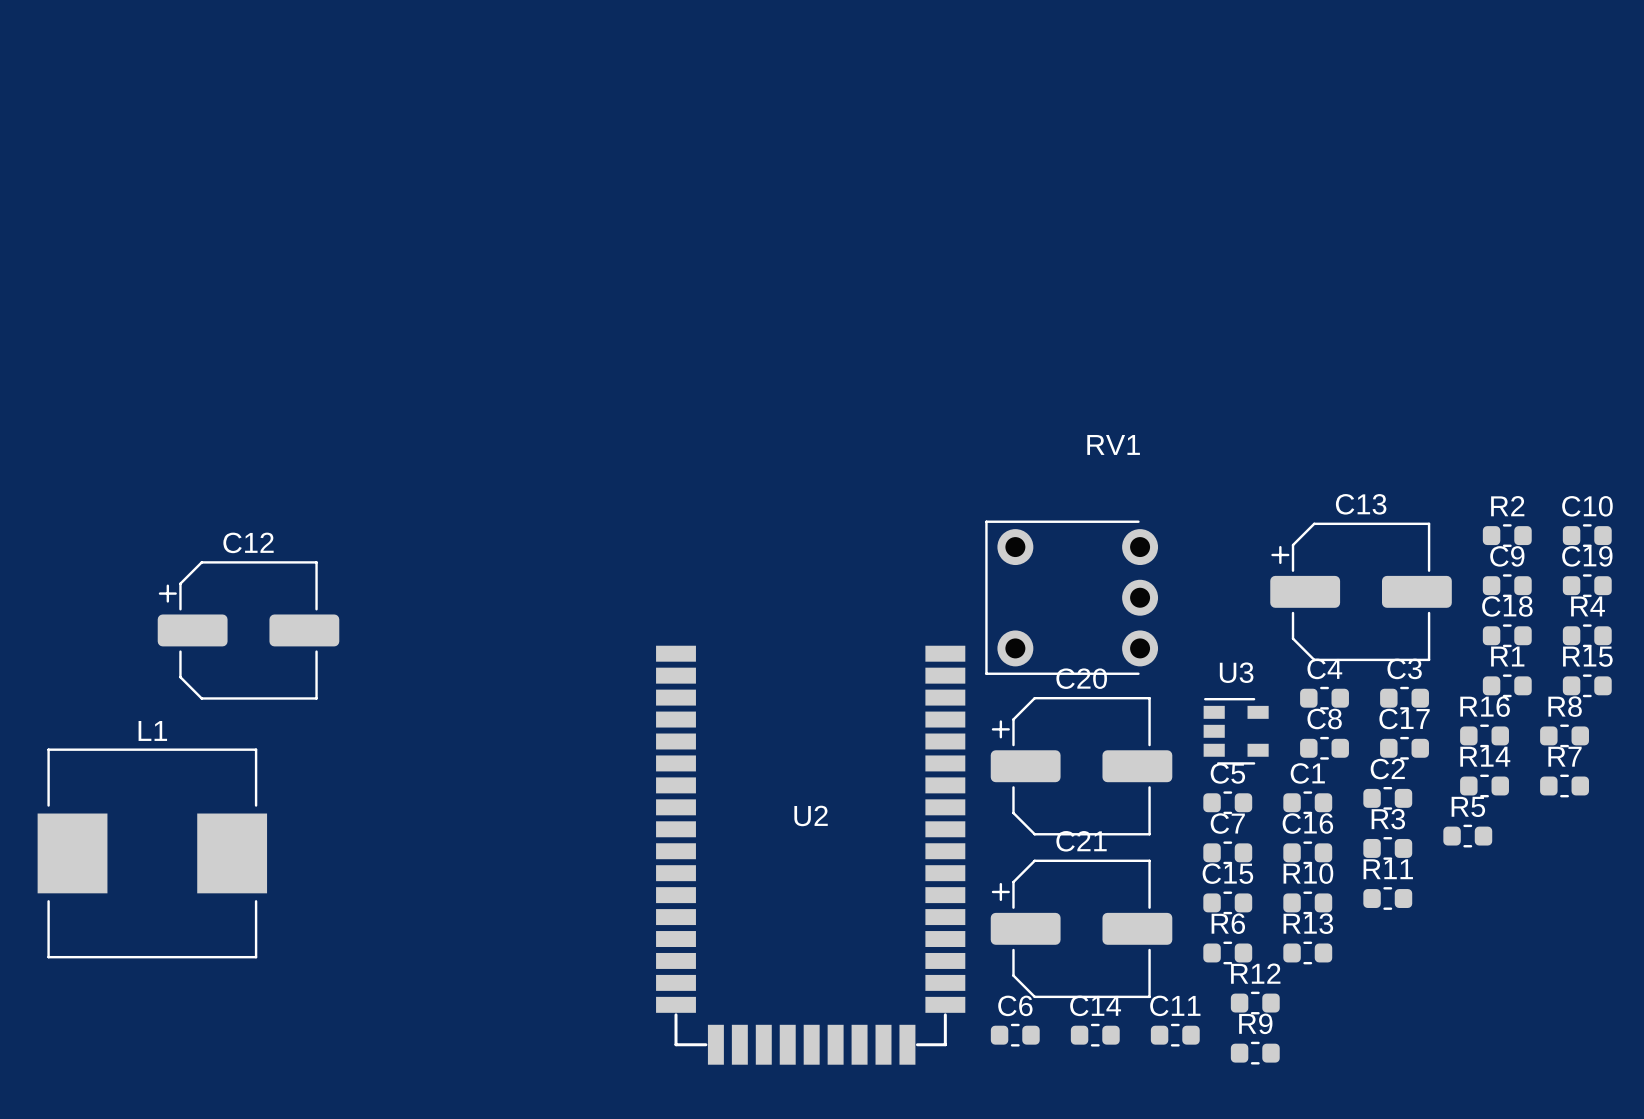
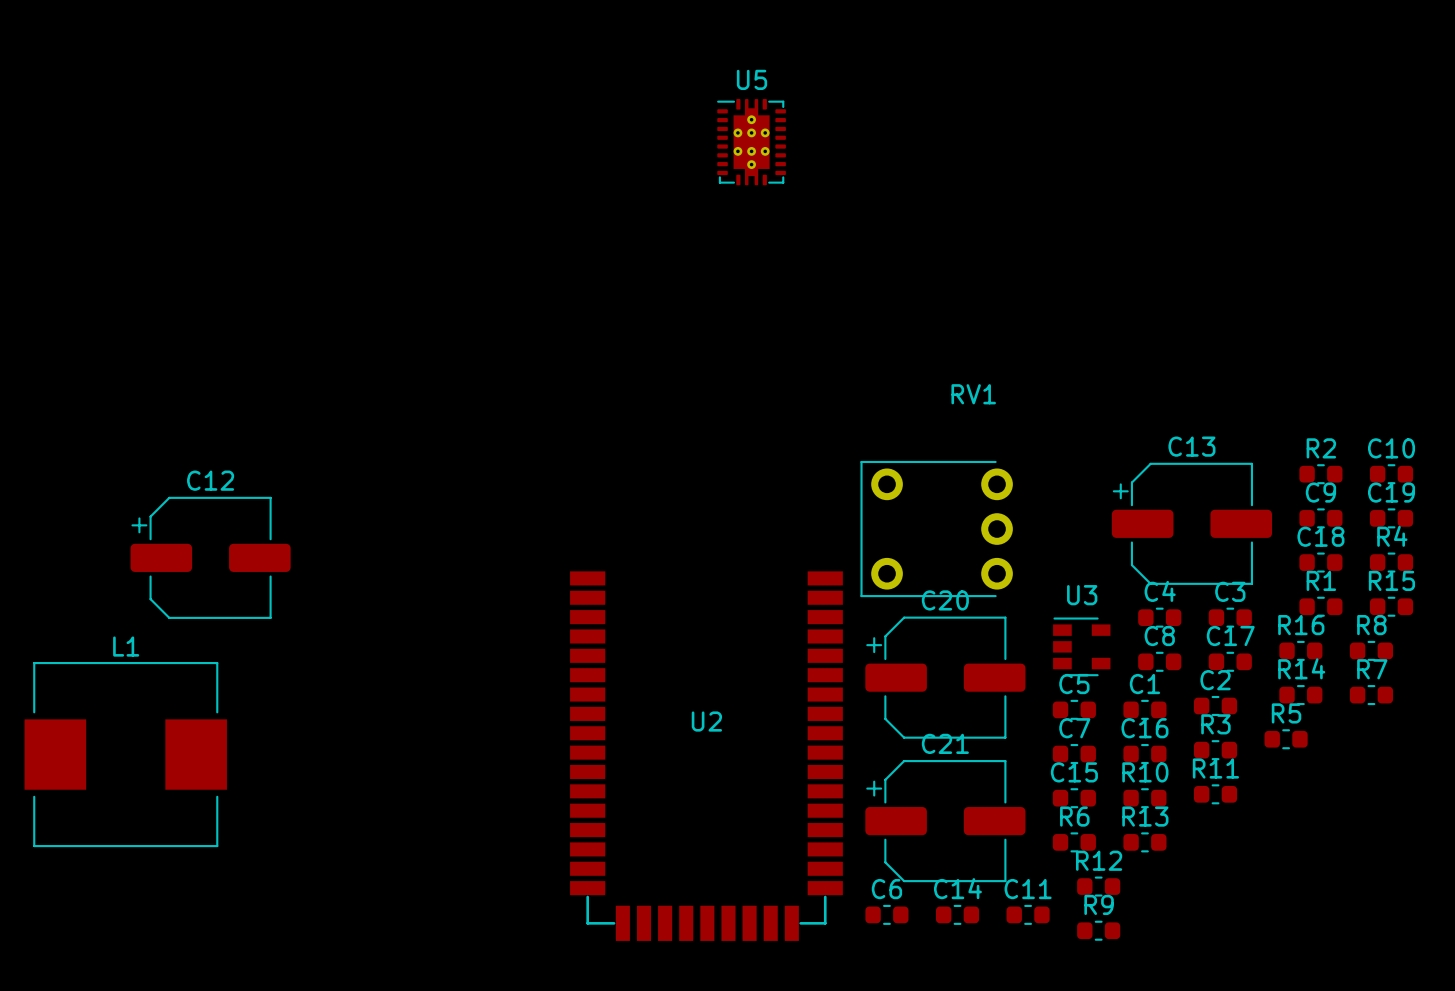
U5: none -> (751, 142)

